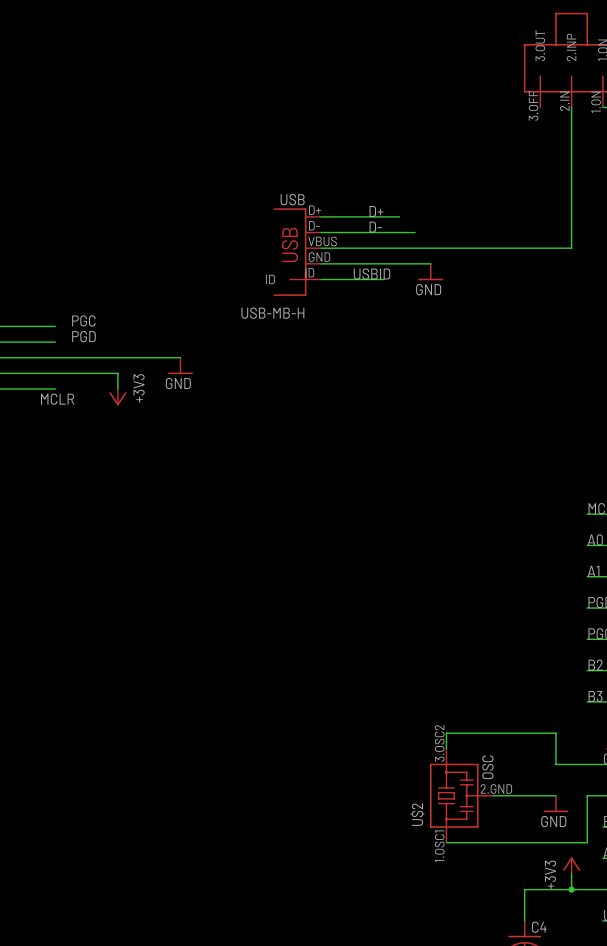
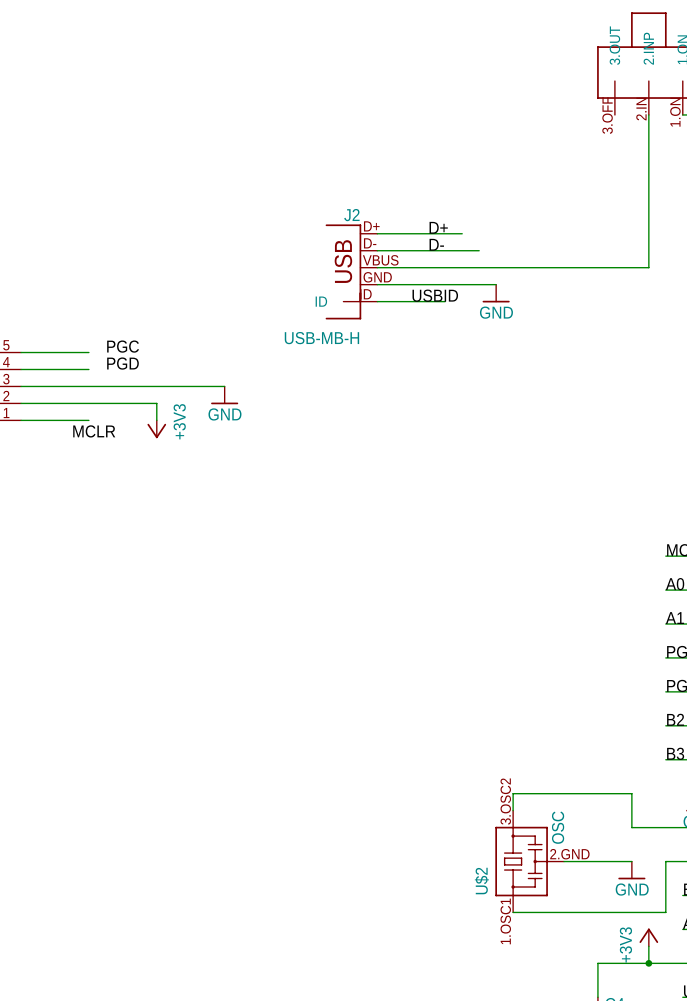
USB name: USB (292, 199) -> J2 (351, 215)

